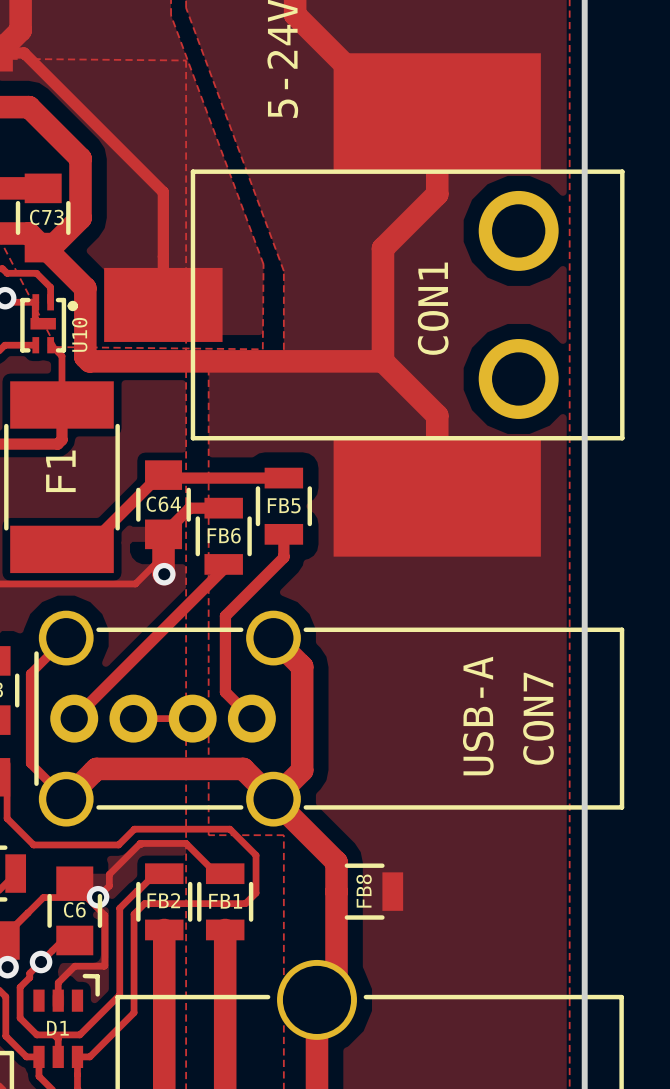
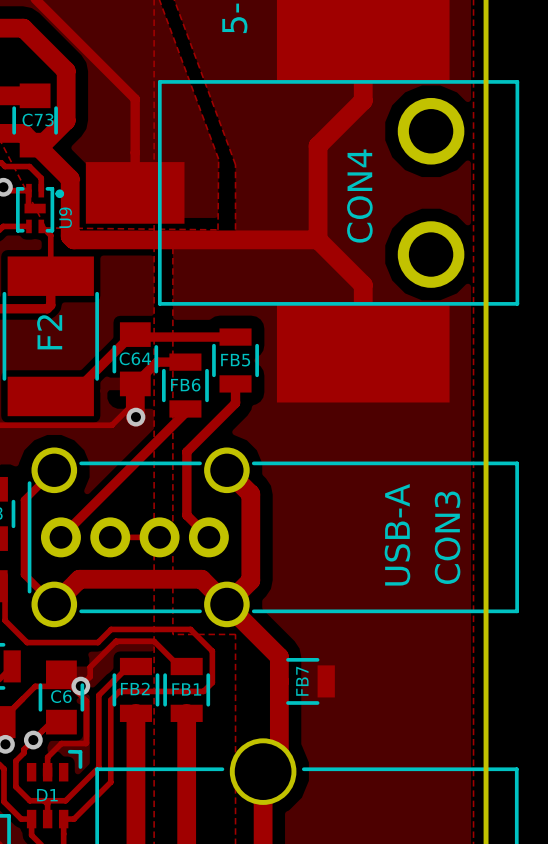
CON1 name: CON1 (433, 308) -> CON4 (359, 196)
U10 name: U10 (79, 334) -> U9 (65, 217)
F1 name: F1 (60, 471) -> F2 (49, 332)
CON7 name: CON7 (538, 718) -> CON3 (447, 537)
FB8 name: FB8 (364, 891) -> FB7 (302, 681)

